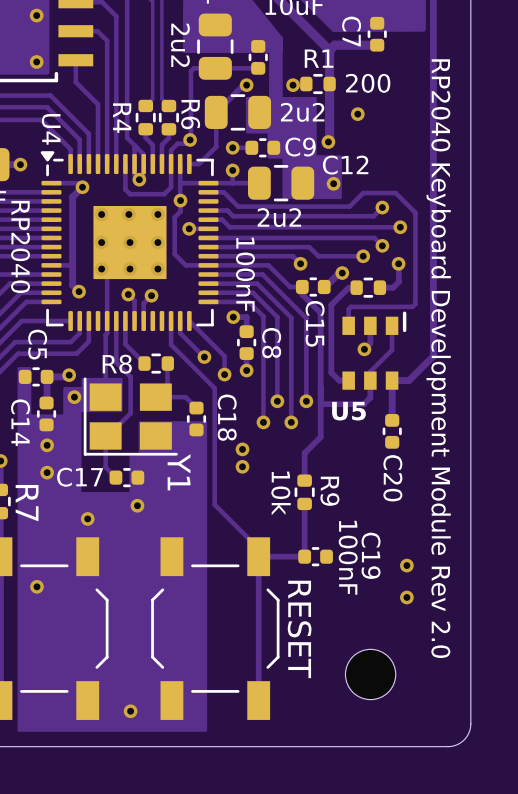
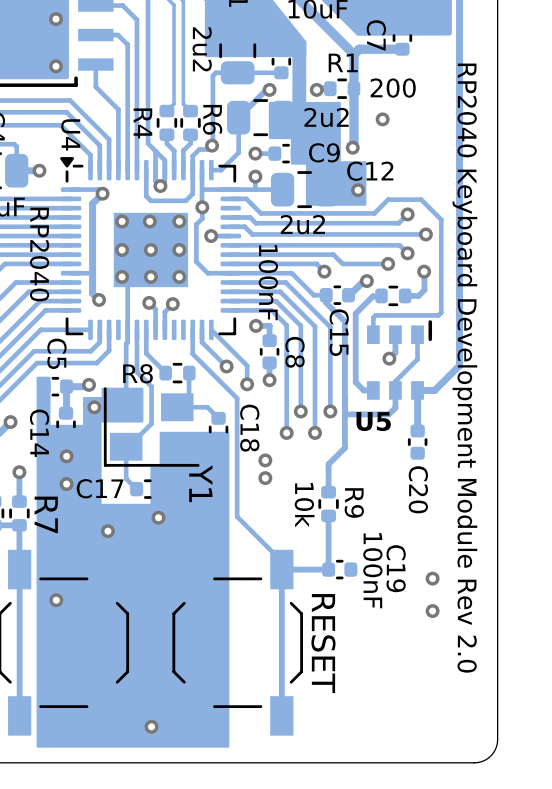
part: (370, 674) -> none

